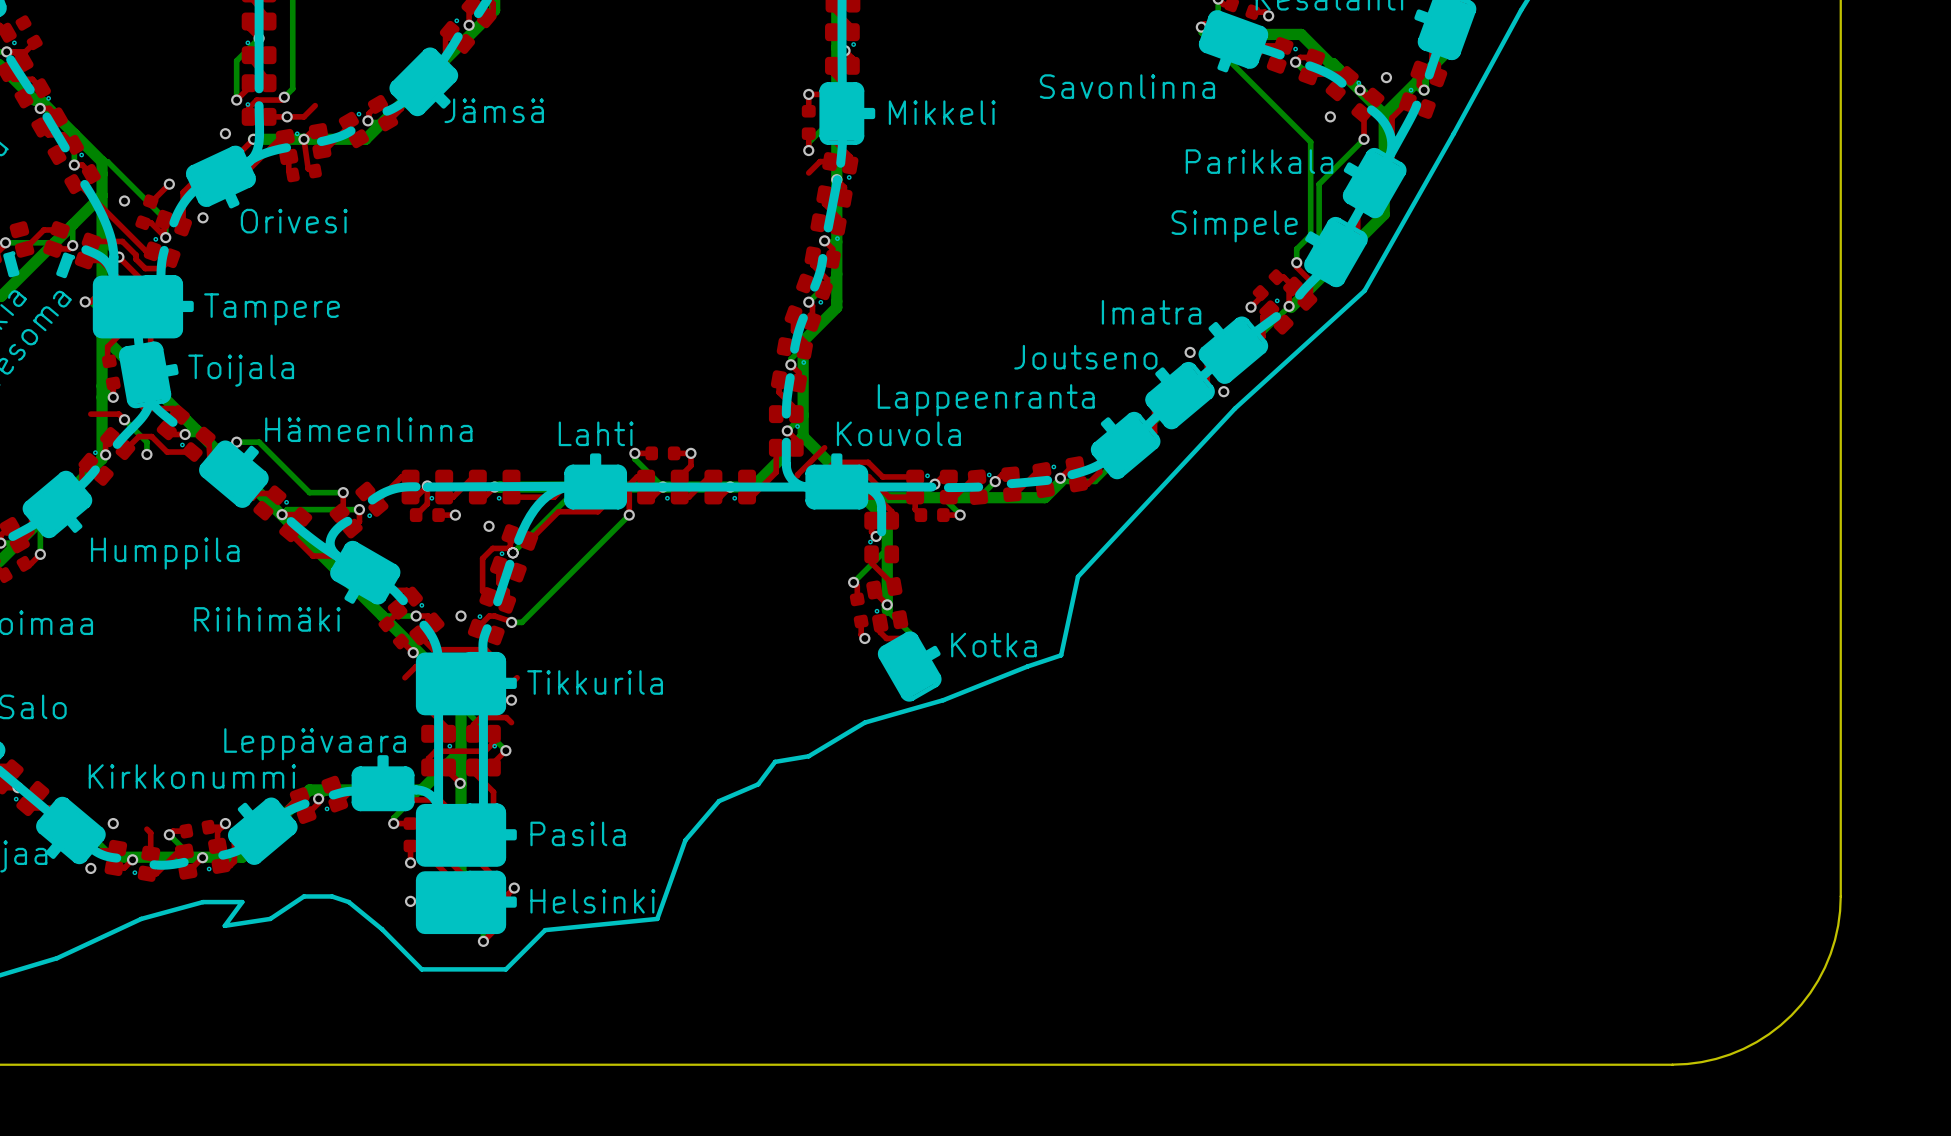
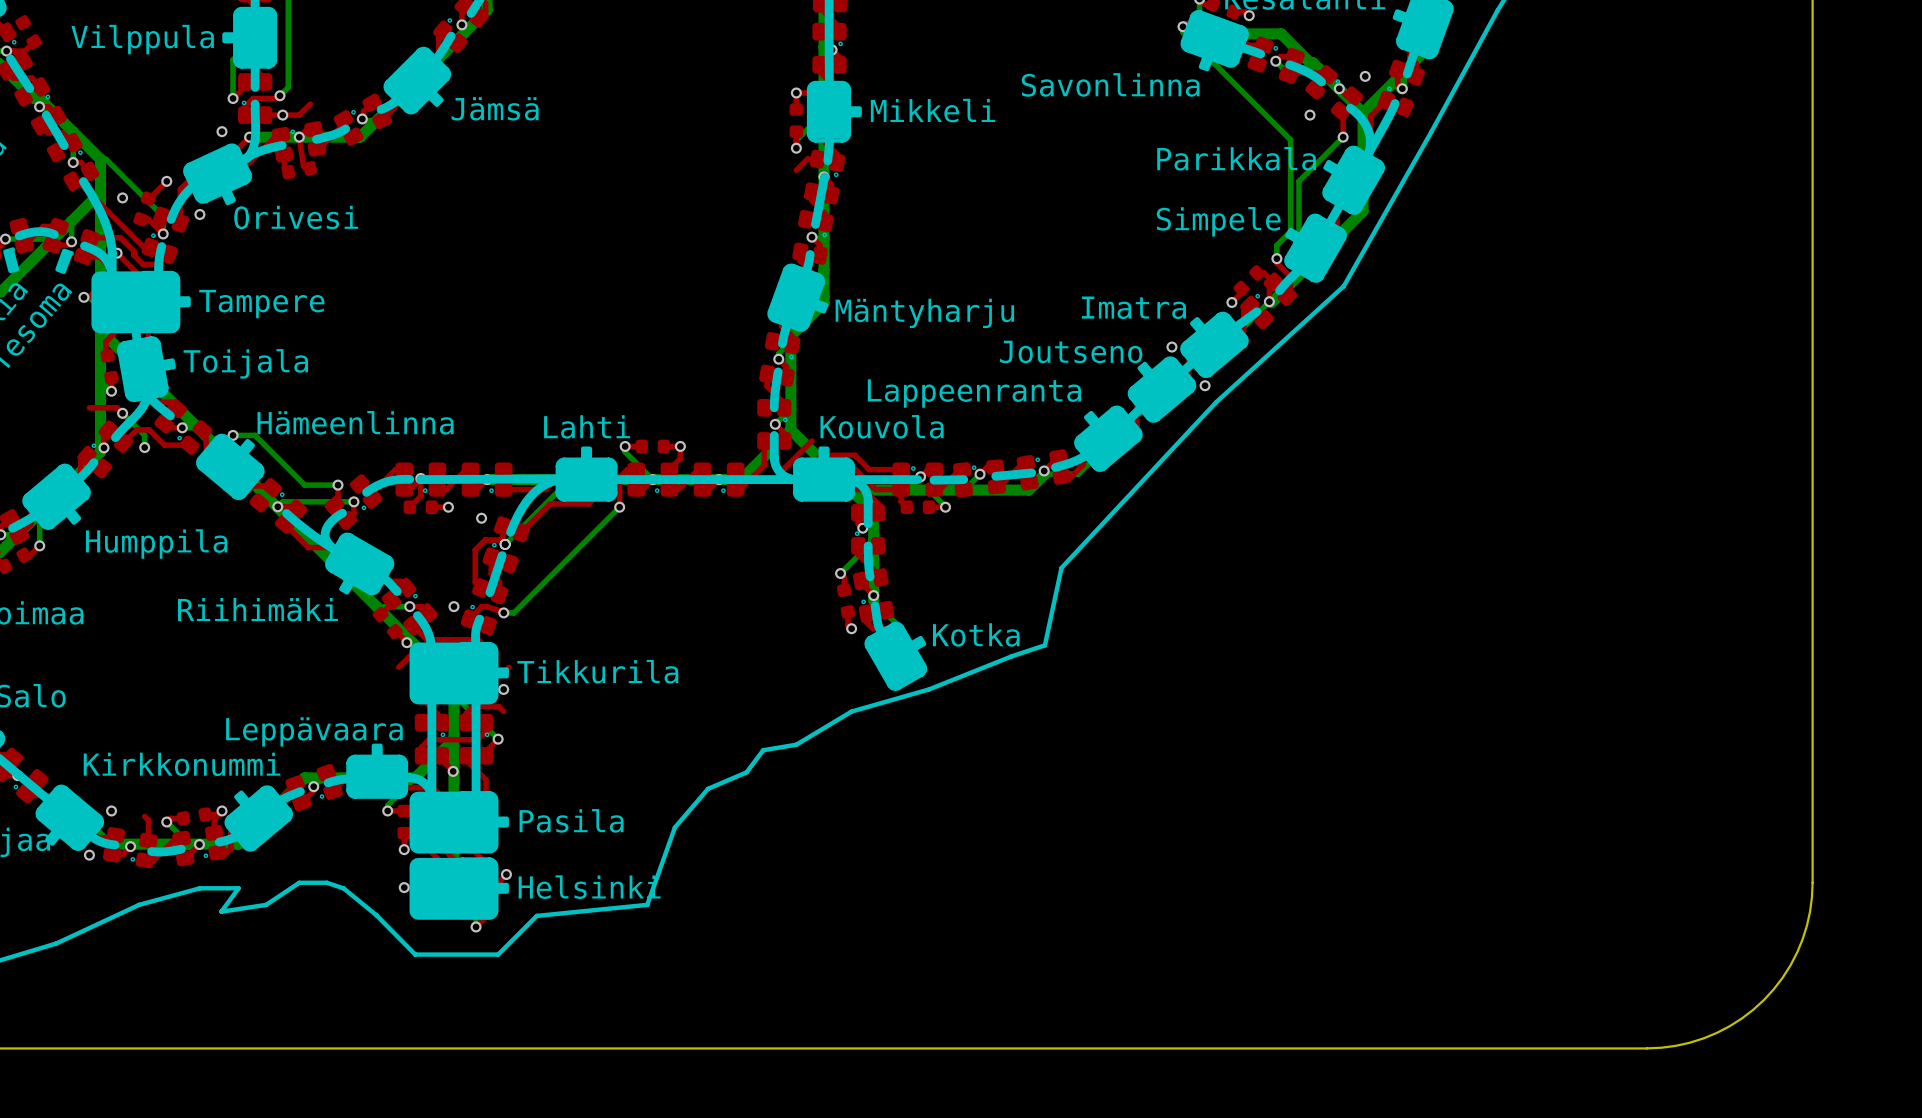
drawing: none -> [222, 6, 278, 69]
line: none -> (54, 234) (38, 231) (19, 235)
drawing: none -> [767, 263, 829, 332]
line: none -> (868, 545) (870, 576)
line: none -> (875, 605) (878, 624) (881, 631)

